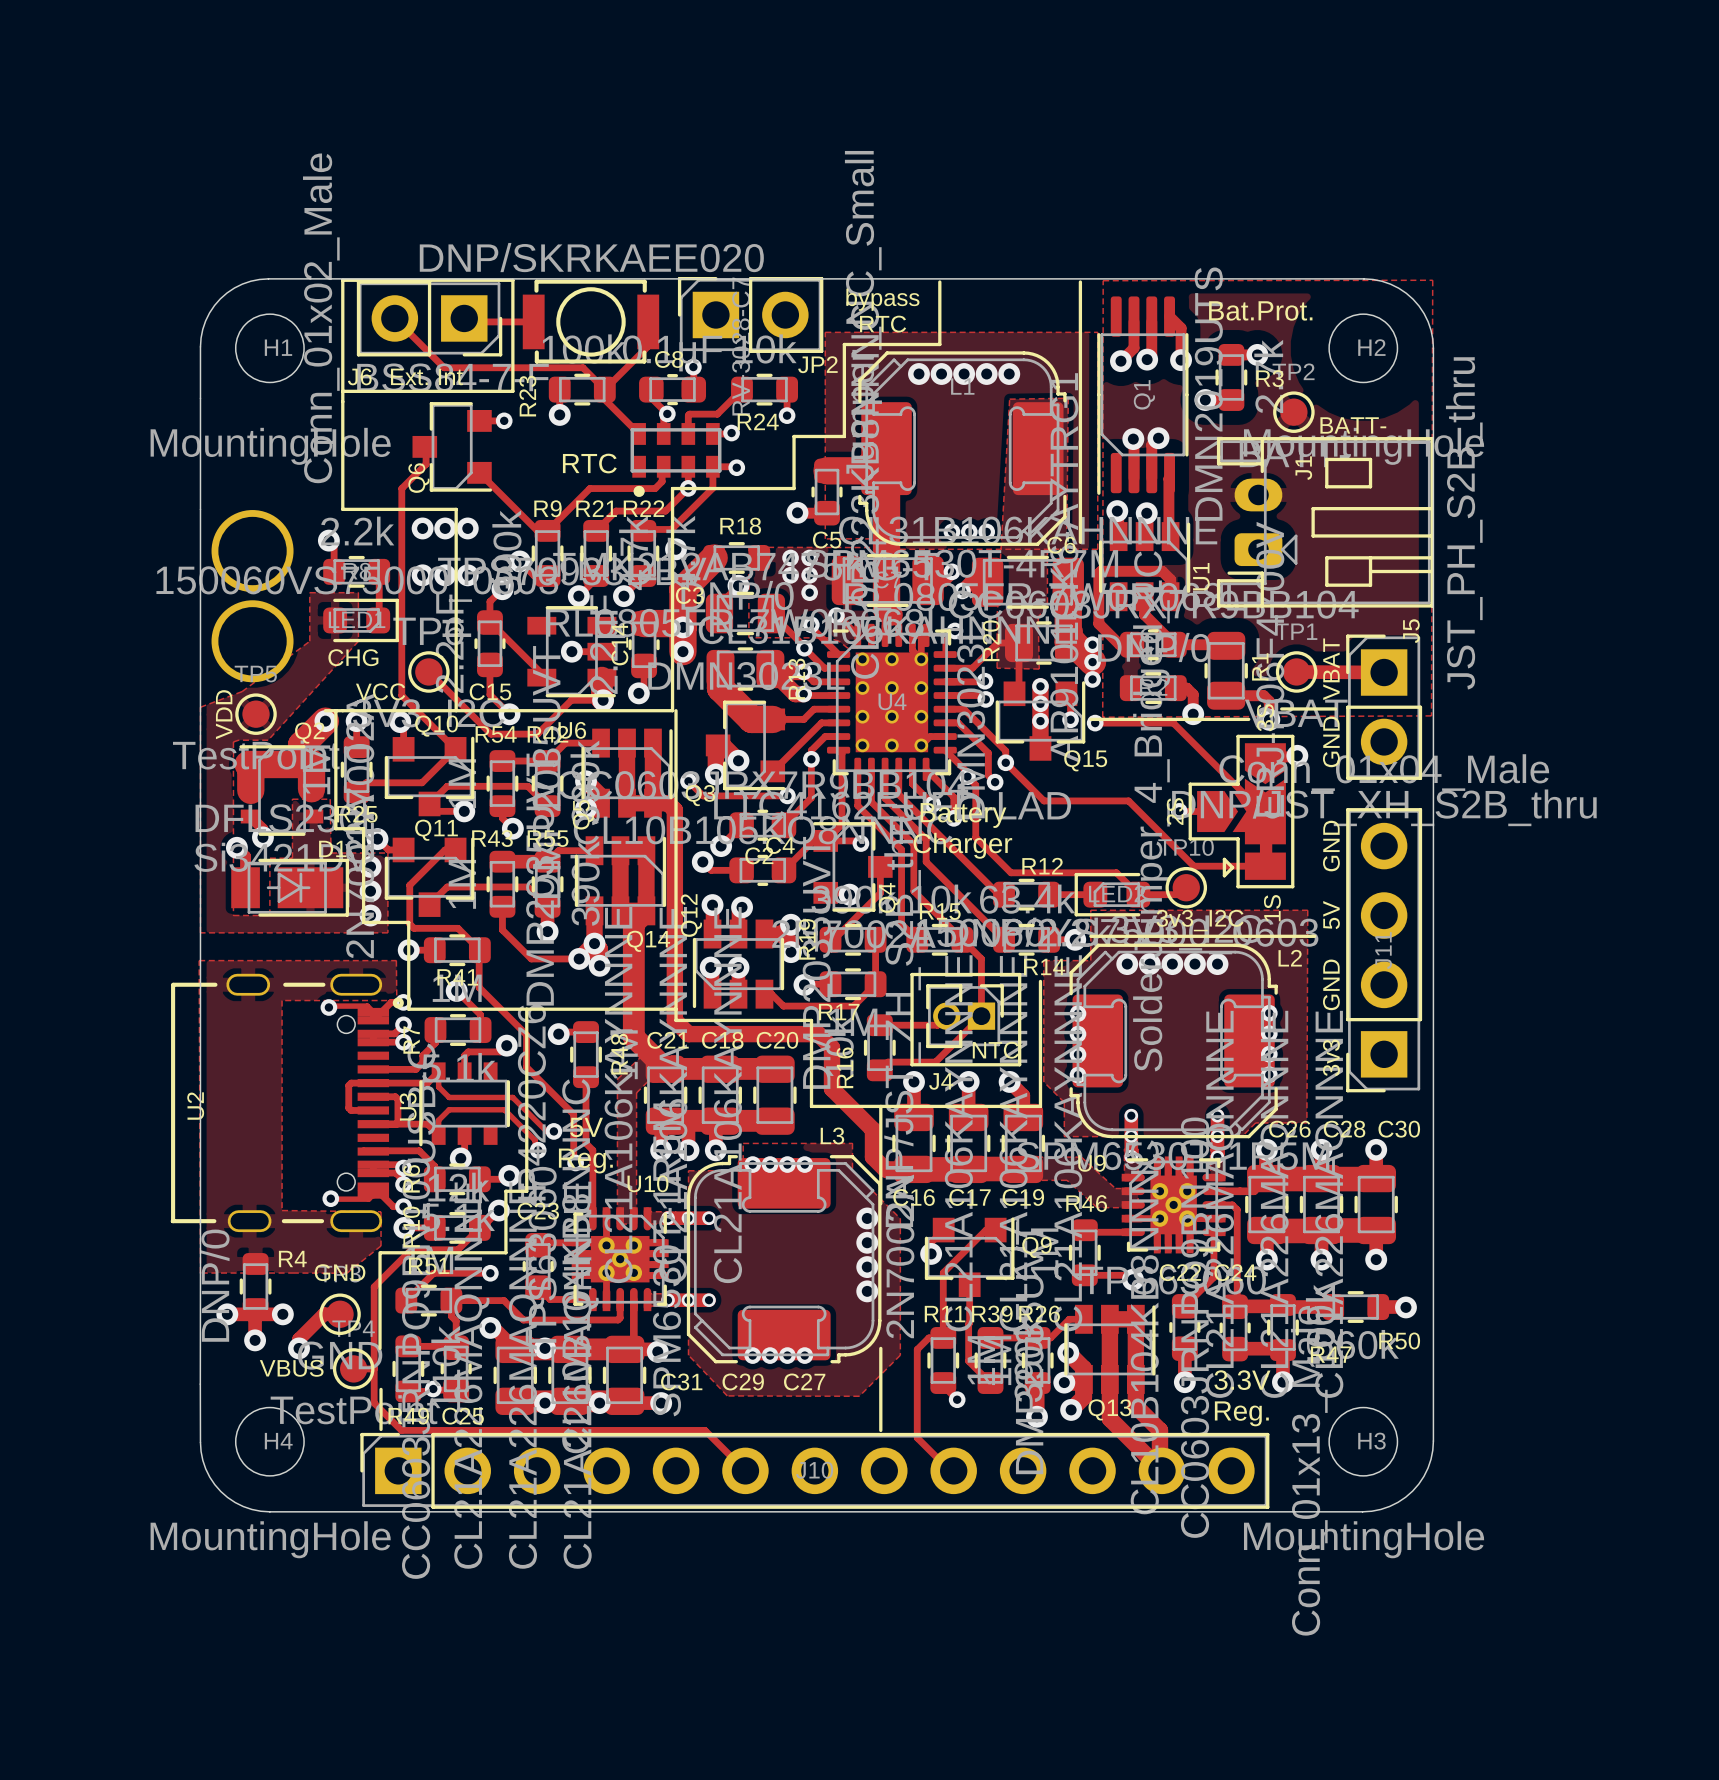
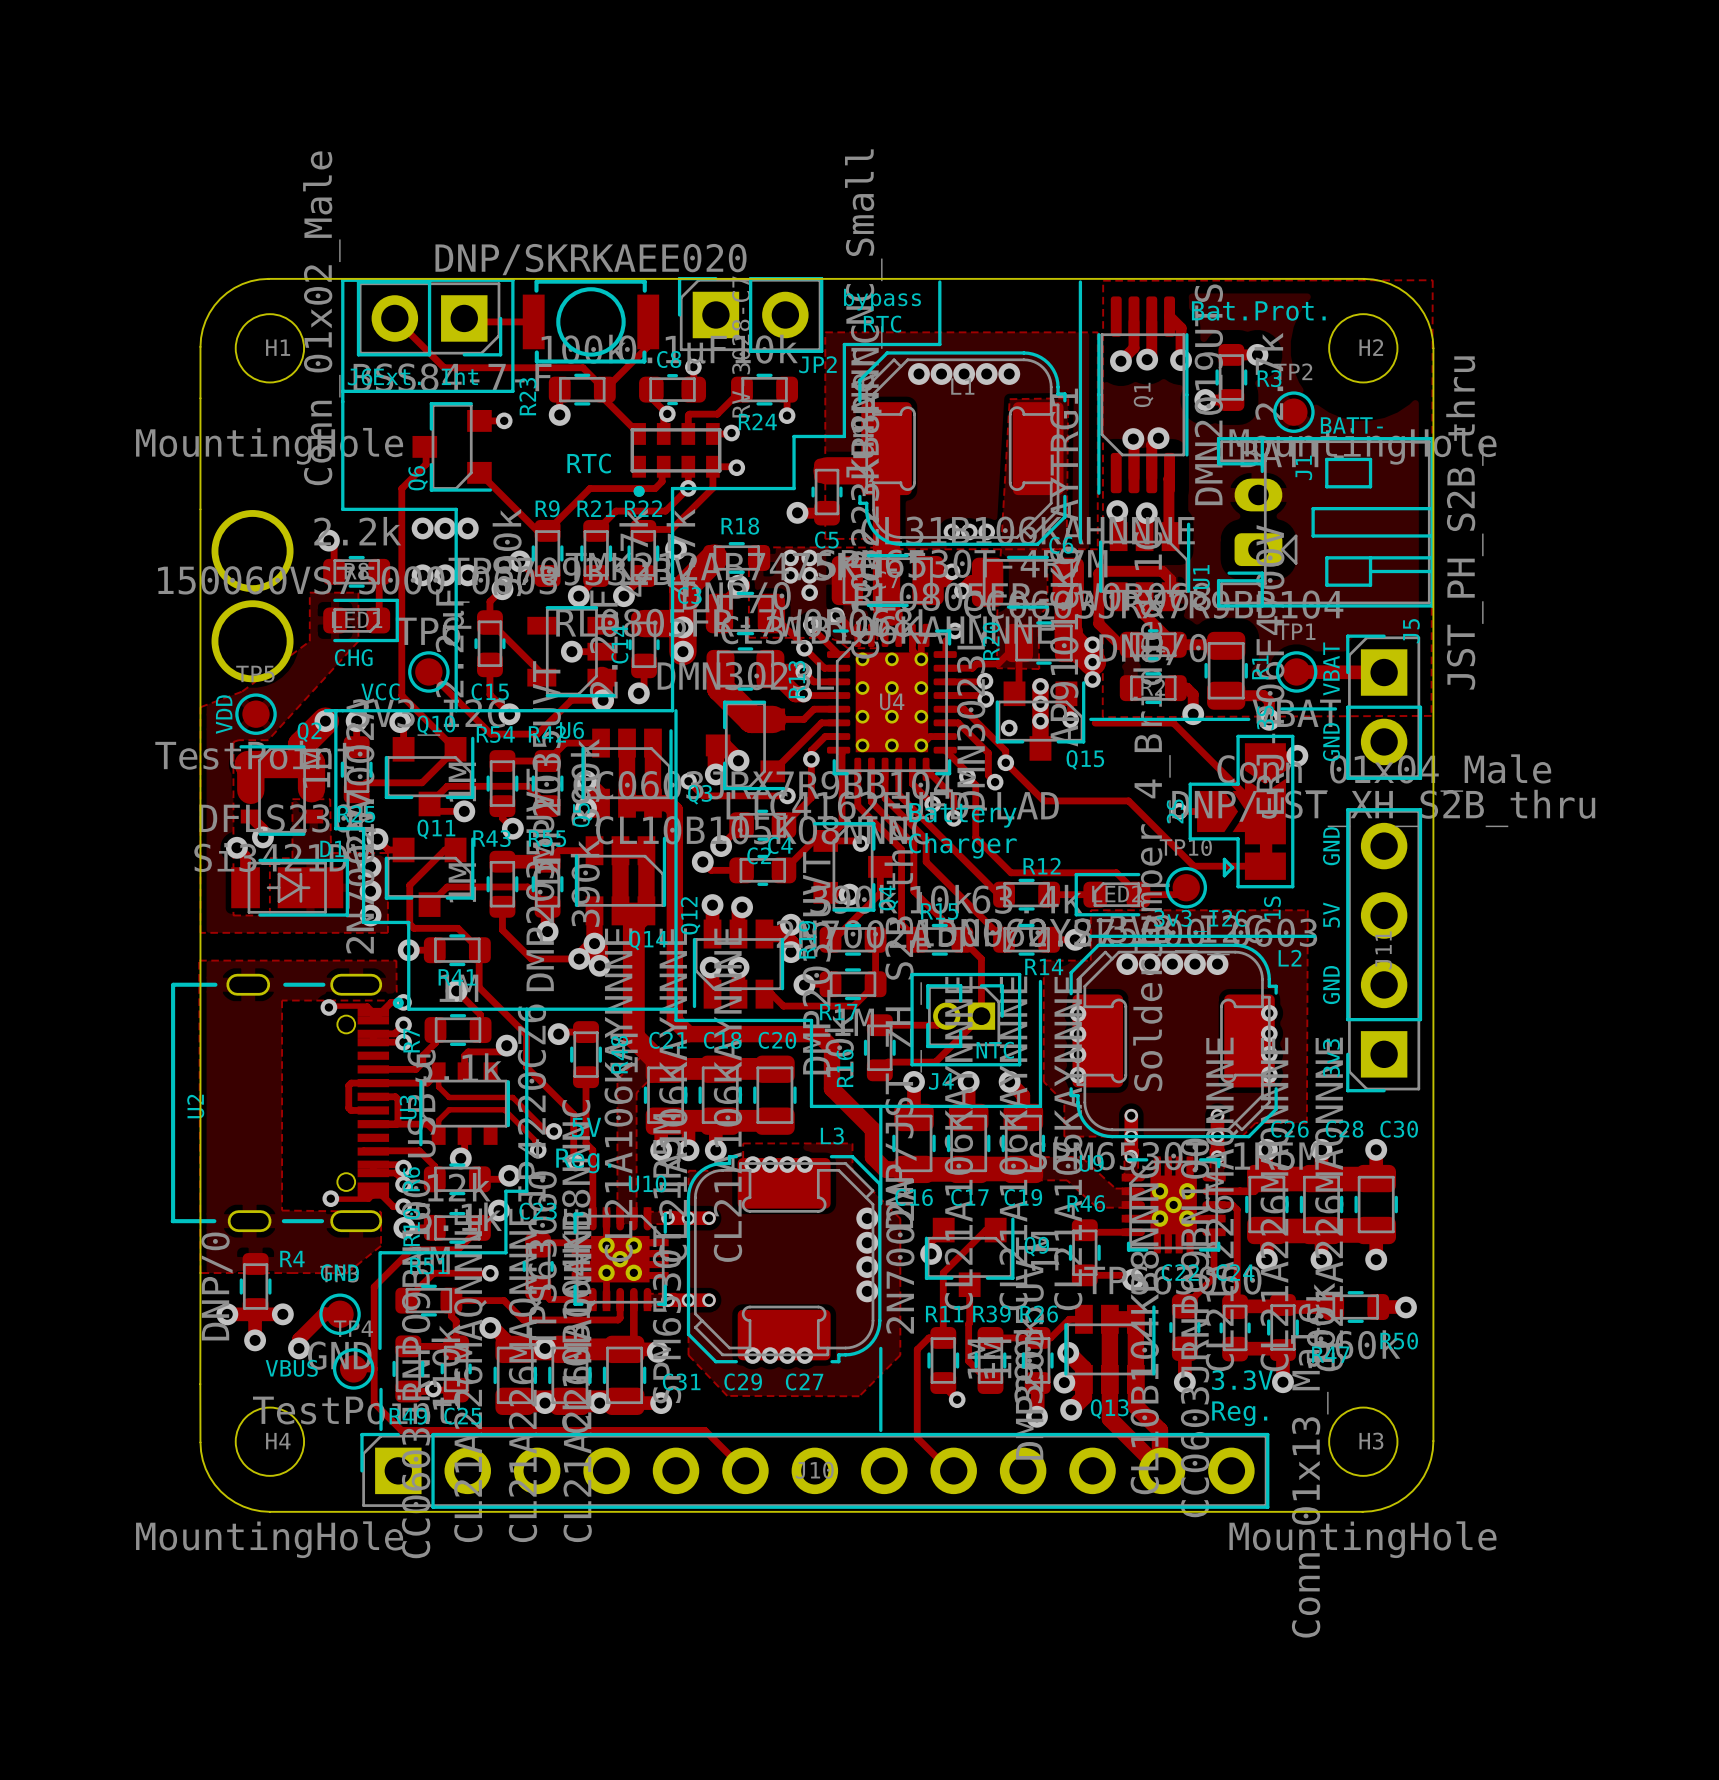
track: (1019, 643) (997, 643) (976, 663) -> (1019, 643) (998, 663) (976, 663)
via position: (1095, 723) -> (1009, 728)

